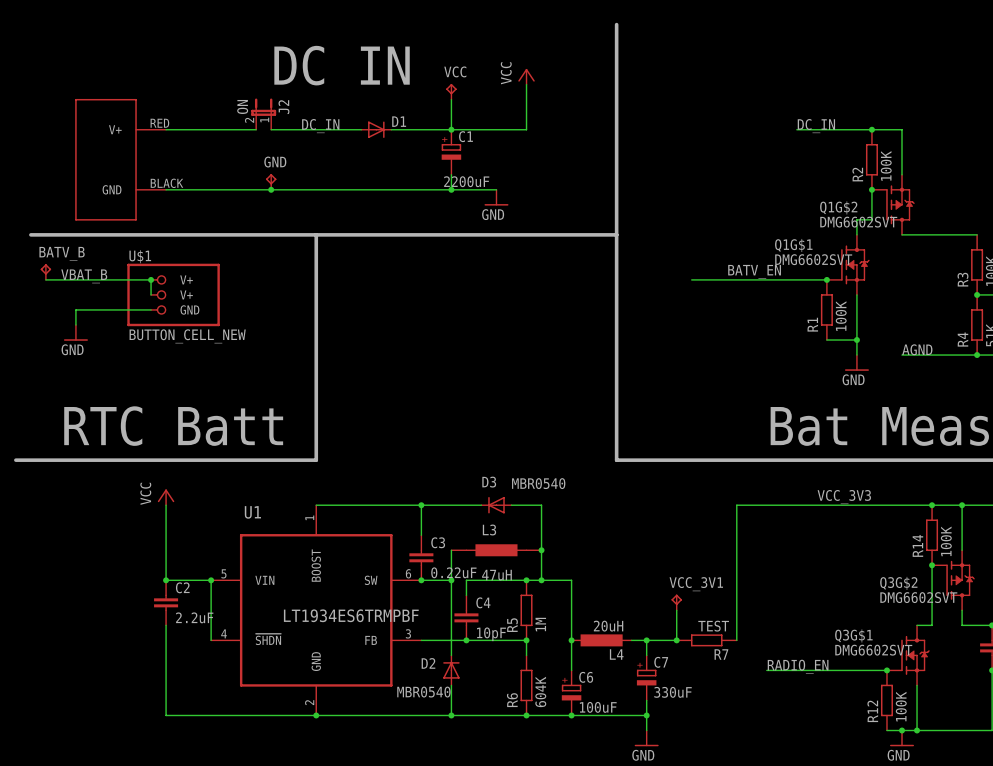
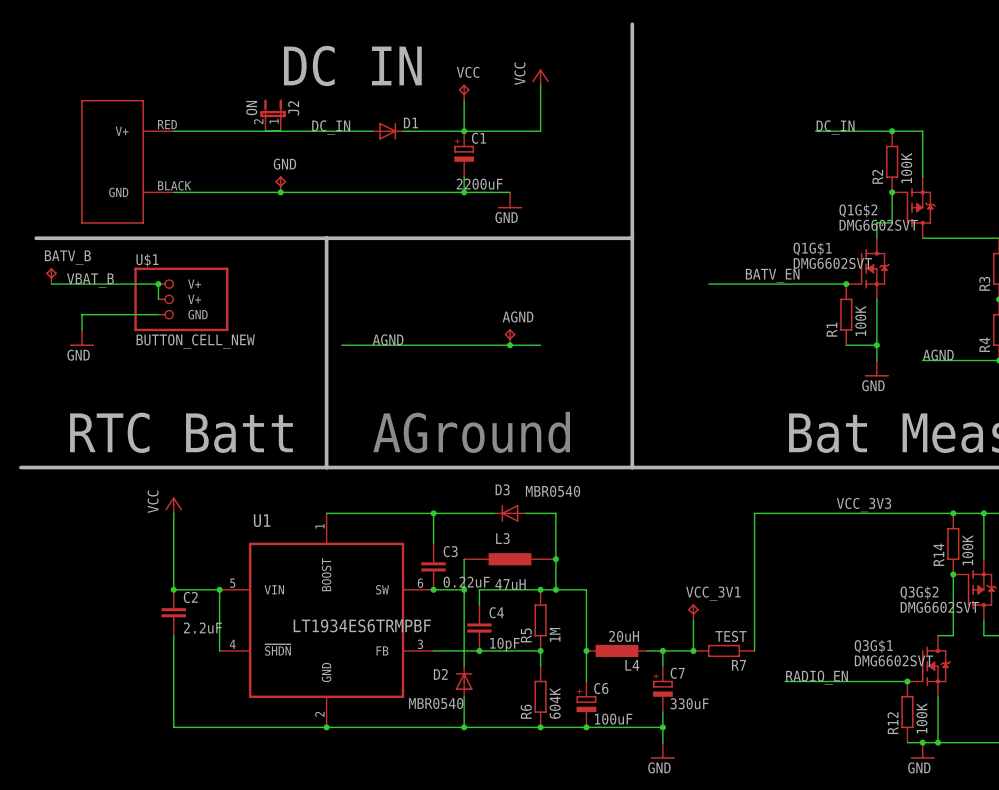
wire: none -> (265, 131) (280, 131)
AGND: none -> (510, 337)
label: none -> AGND (388, 339)
wire: none -> (341, 345) (540, 345)
junction: none -> (510, 345)
text: none -> AGround (471, 432)
line: none -> (326, 467) (632, 467)

